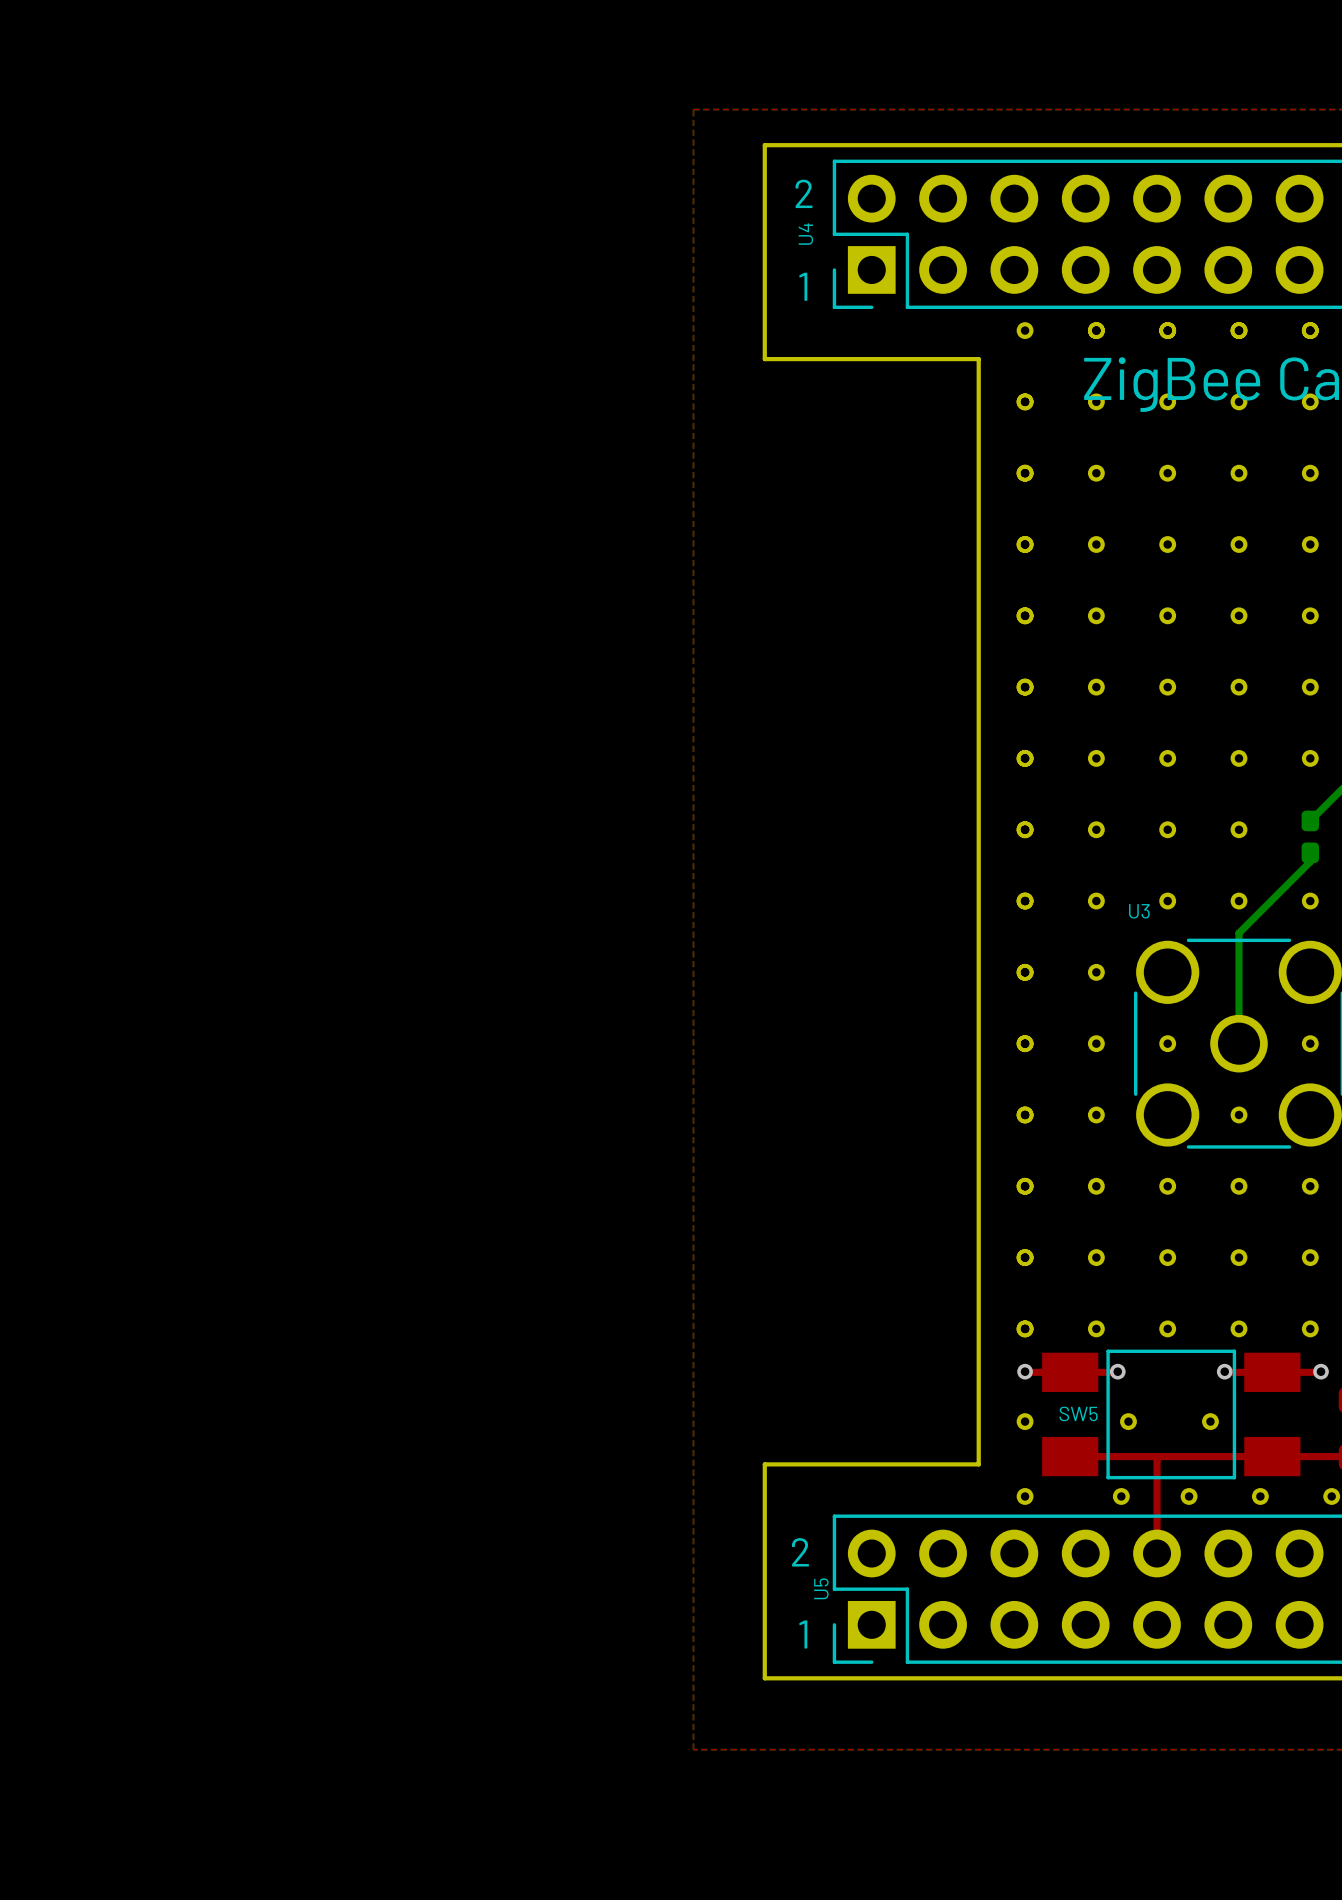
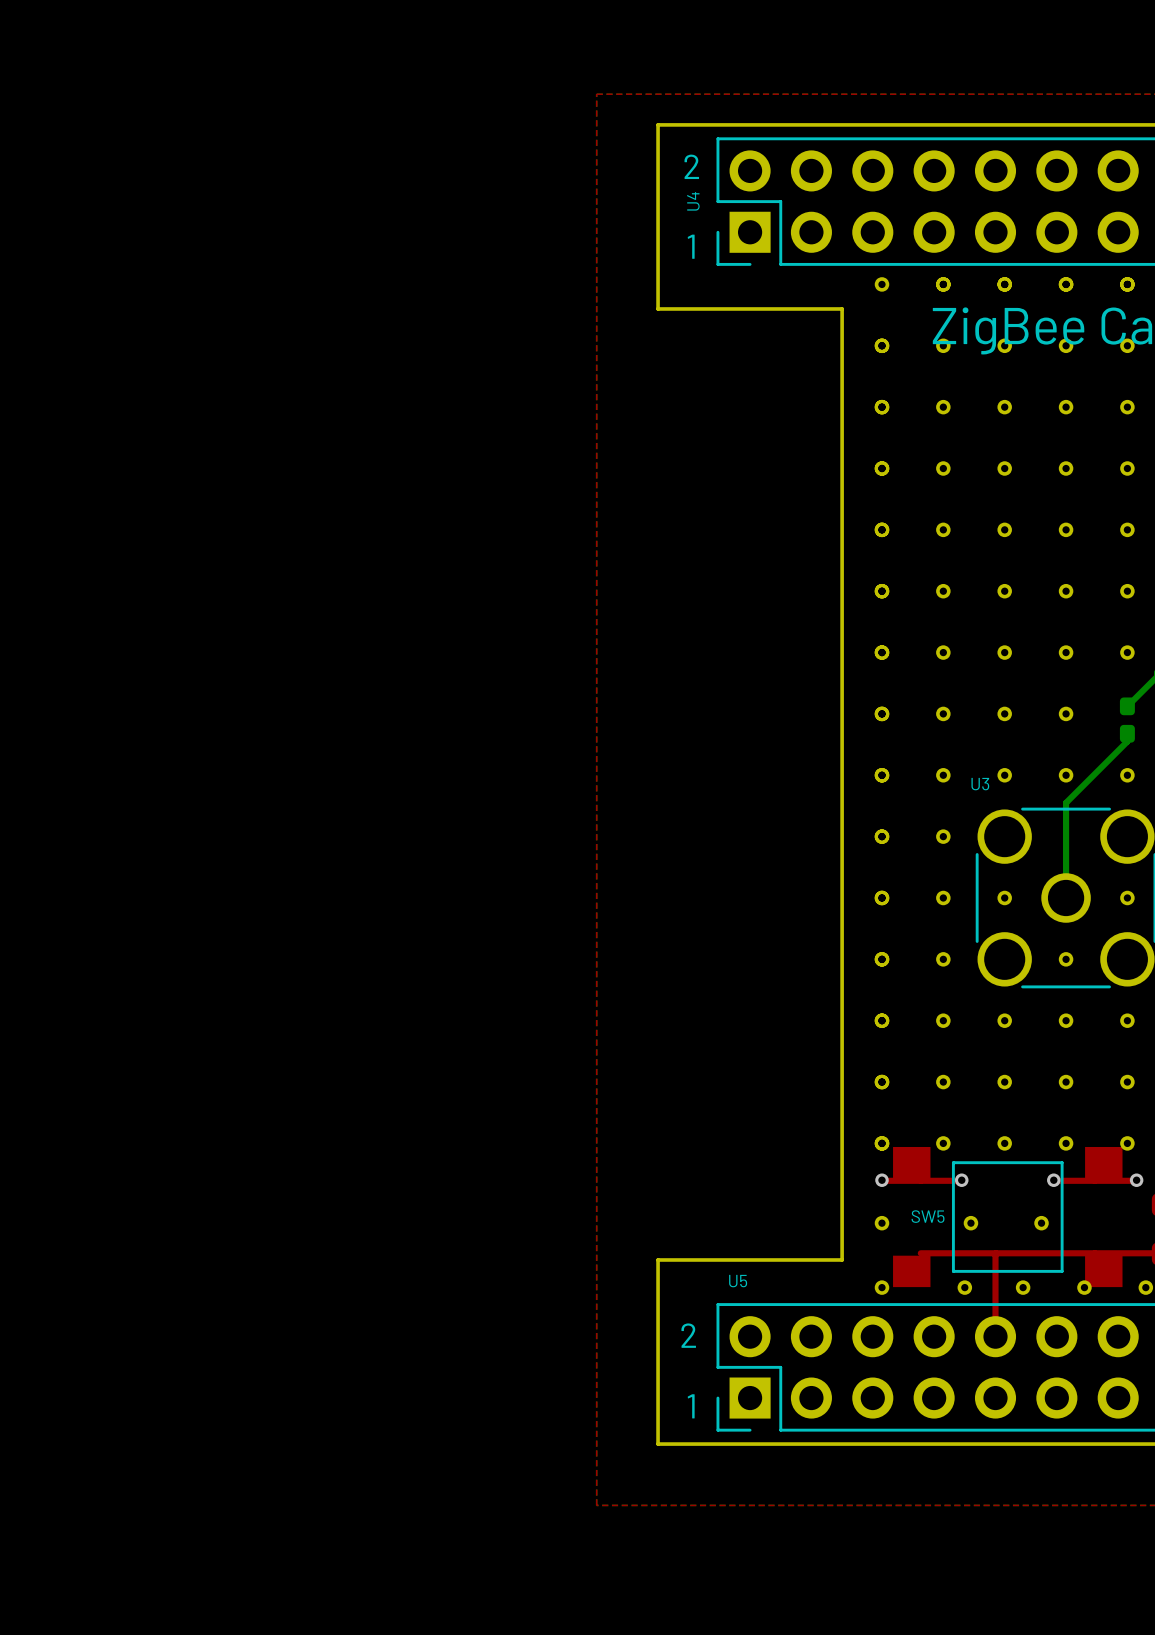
SW5 footprint: [1042, 1349, 1301, 1480] -> [893, 1146, 1123, 1288]
U5 name rotation: 0° (821, 1588) -> 90° clockwise (738, 1281)
U5 name position: U5 (821, 1588) -> U5 (738, 1281)

